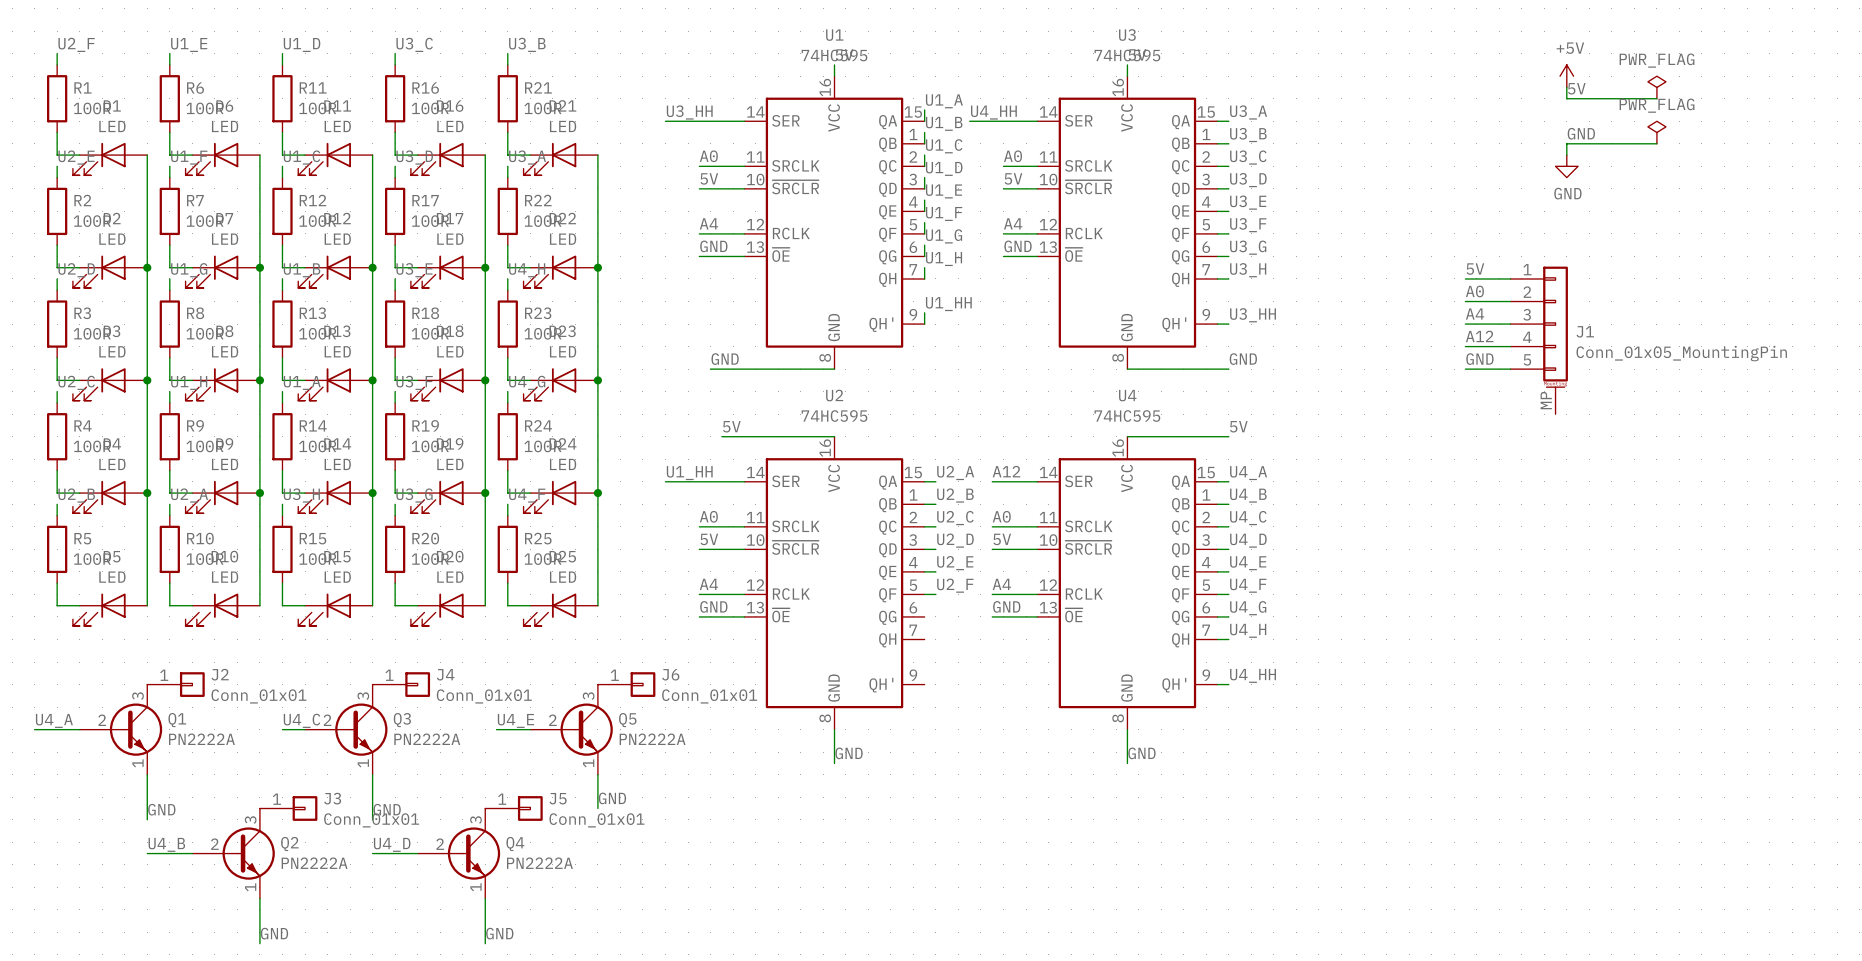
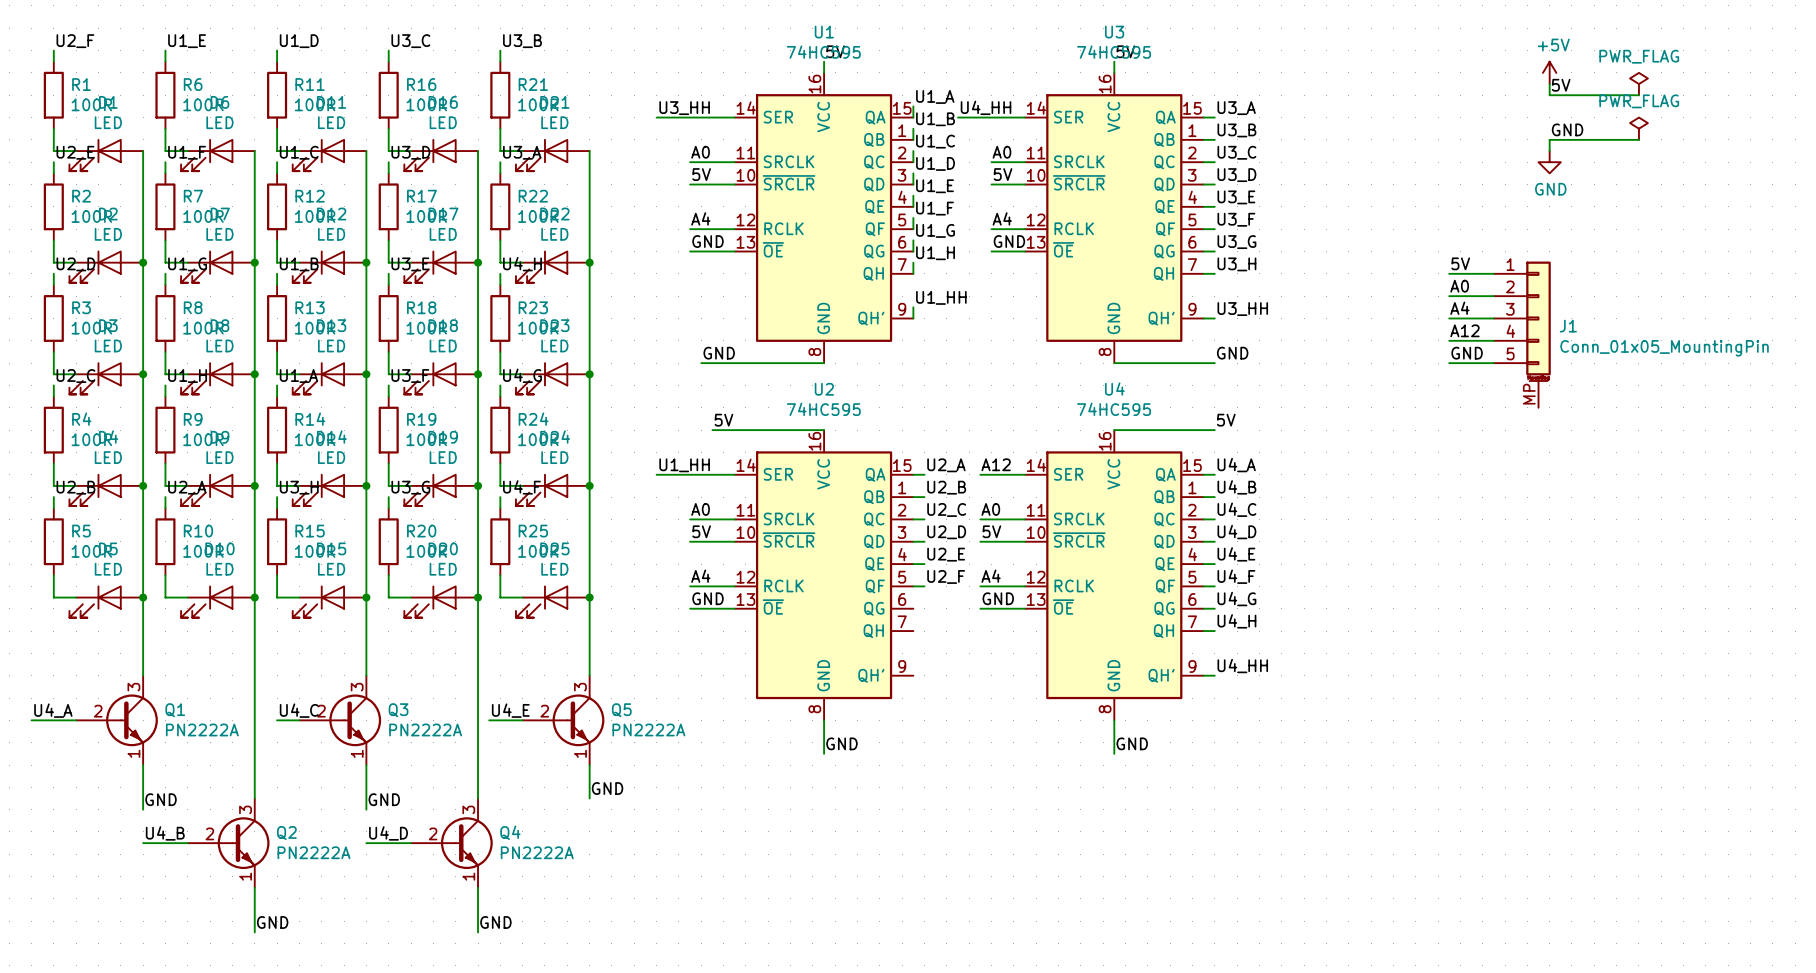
wire: none -> (143, 597) (143, 675)
junction: none -> (143, 597)
wire: none -> (254, 597) (254, 798)
junction: none -> (254, 597)
wire: none -> (366, 597) (366, 675)
junction: none -> (366, 597)
wire: none -> (478, 597) (478, 798)
junction: none -> (478, 597)
wire: none -> (589, 597) (589, 675)
junction: none -> (589, 597)
J2: Conn_01x01 (176, 684) -> none
J4: Conn_01x01 (401, 684) -> none
J6: Conn_01x01 (626, 684) -> none
J3: Conn_01x01 (288, 808) -> none
J5: Conn_01x01 (513, 808) -> none

